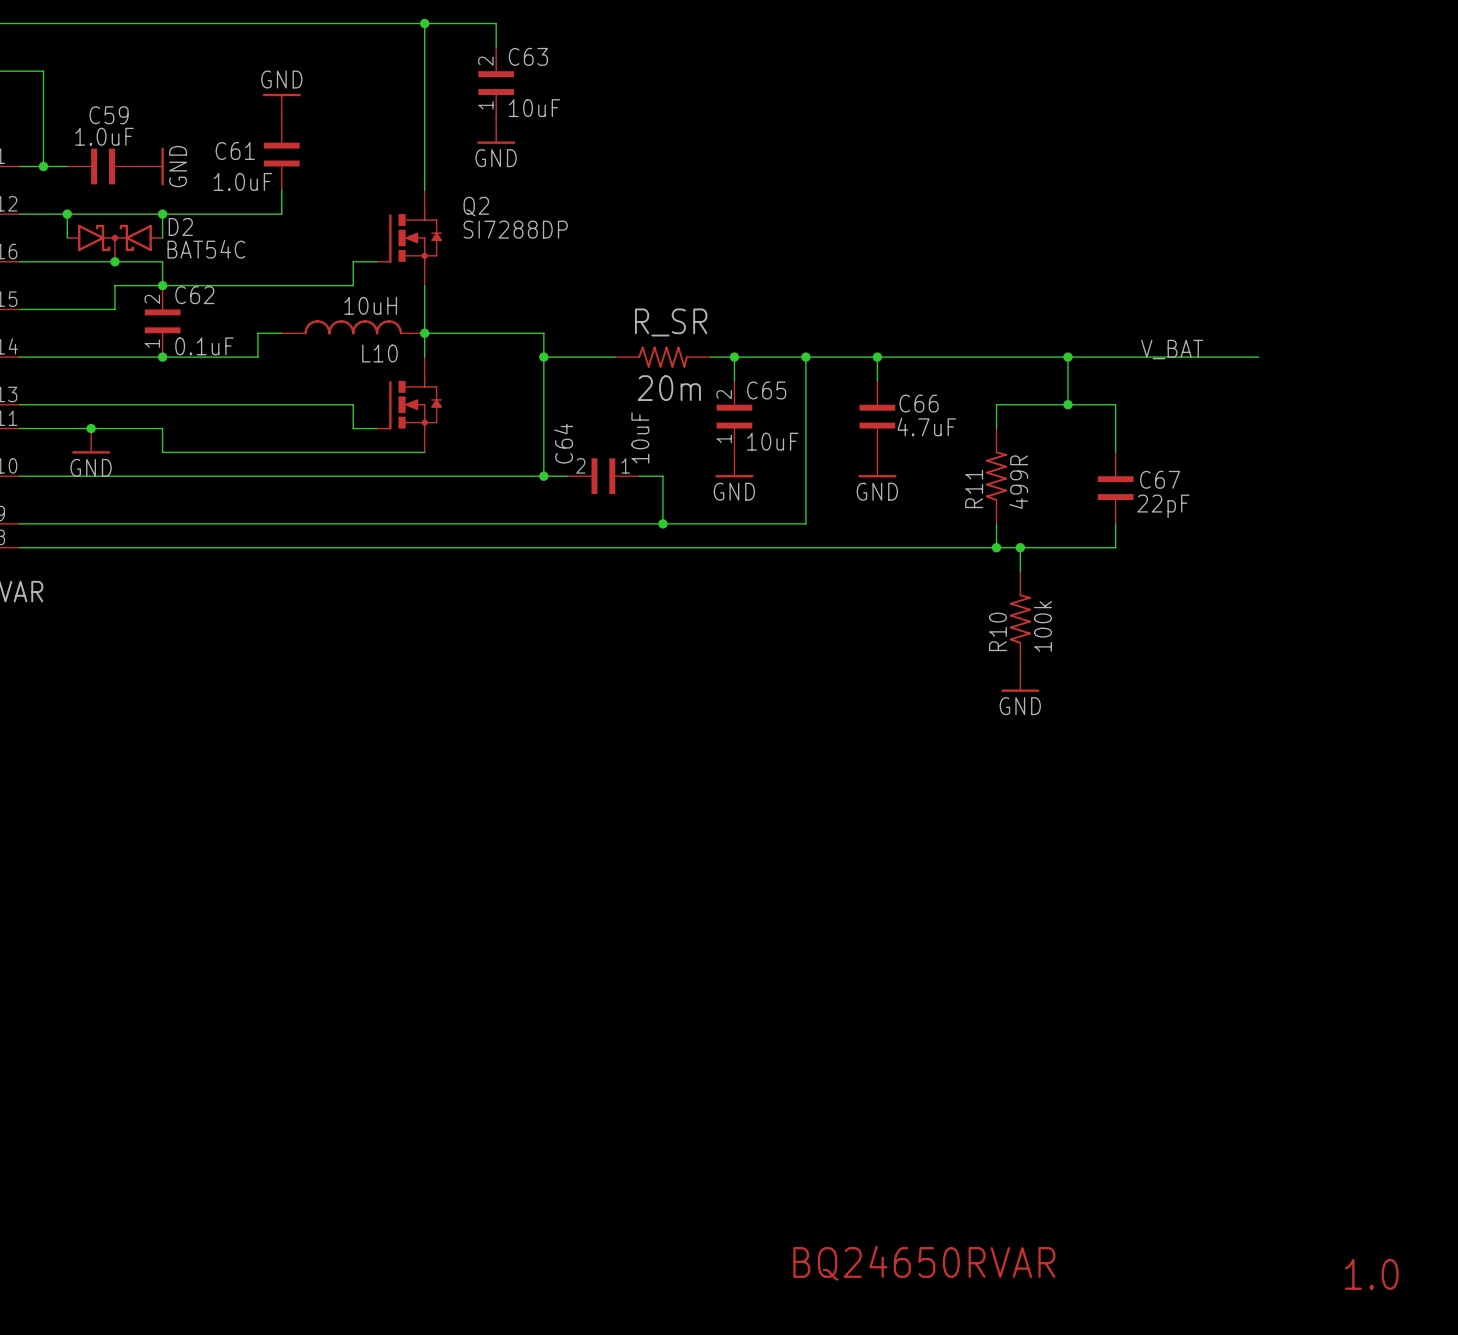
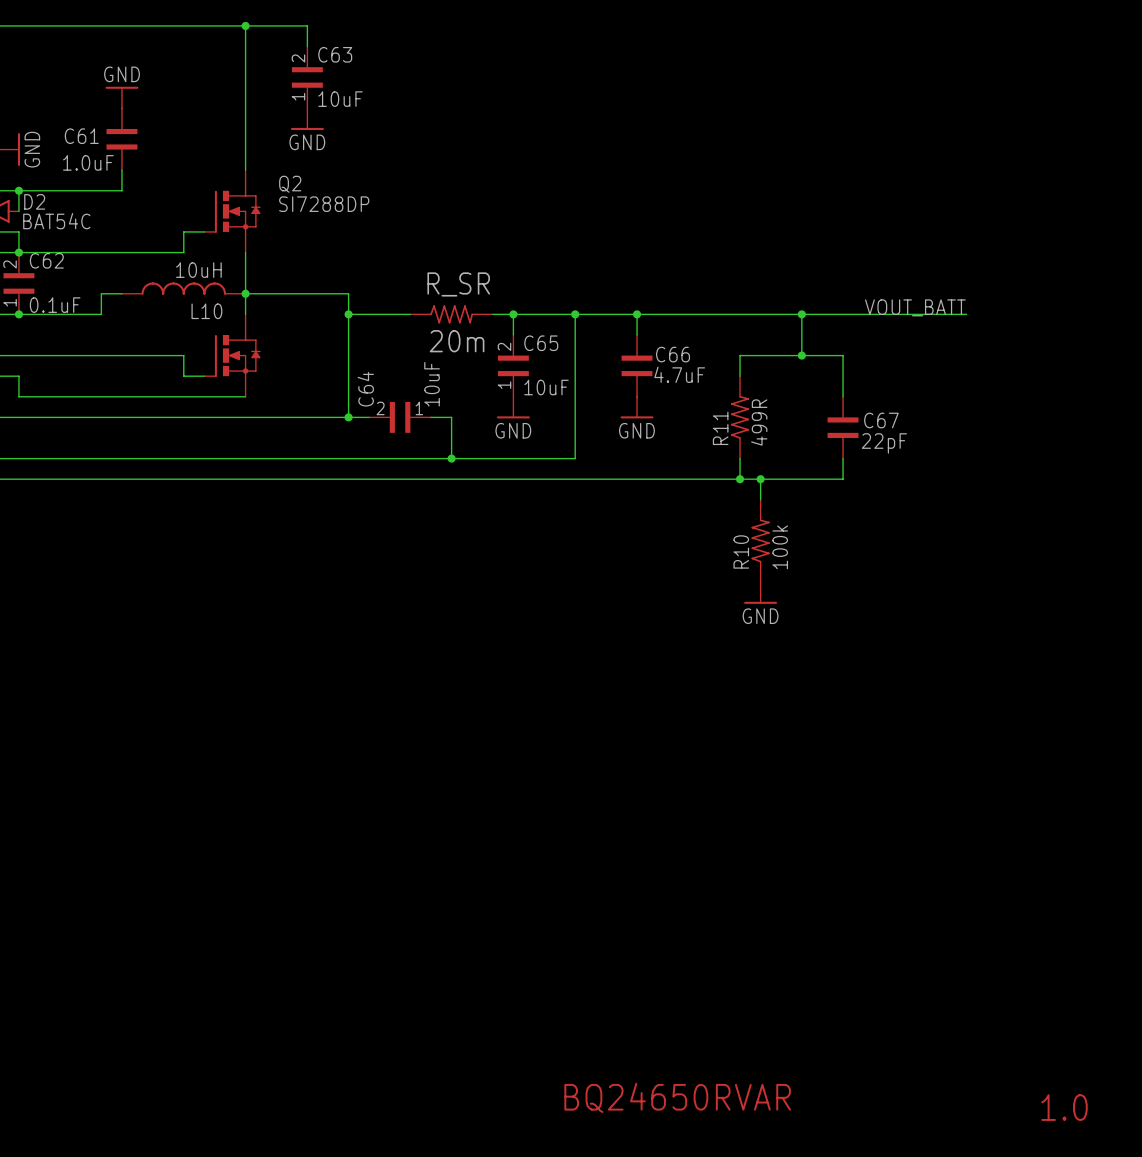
label: V_BAT (1172, 349) -> VOUT_BATT (915, 307)

